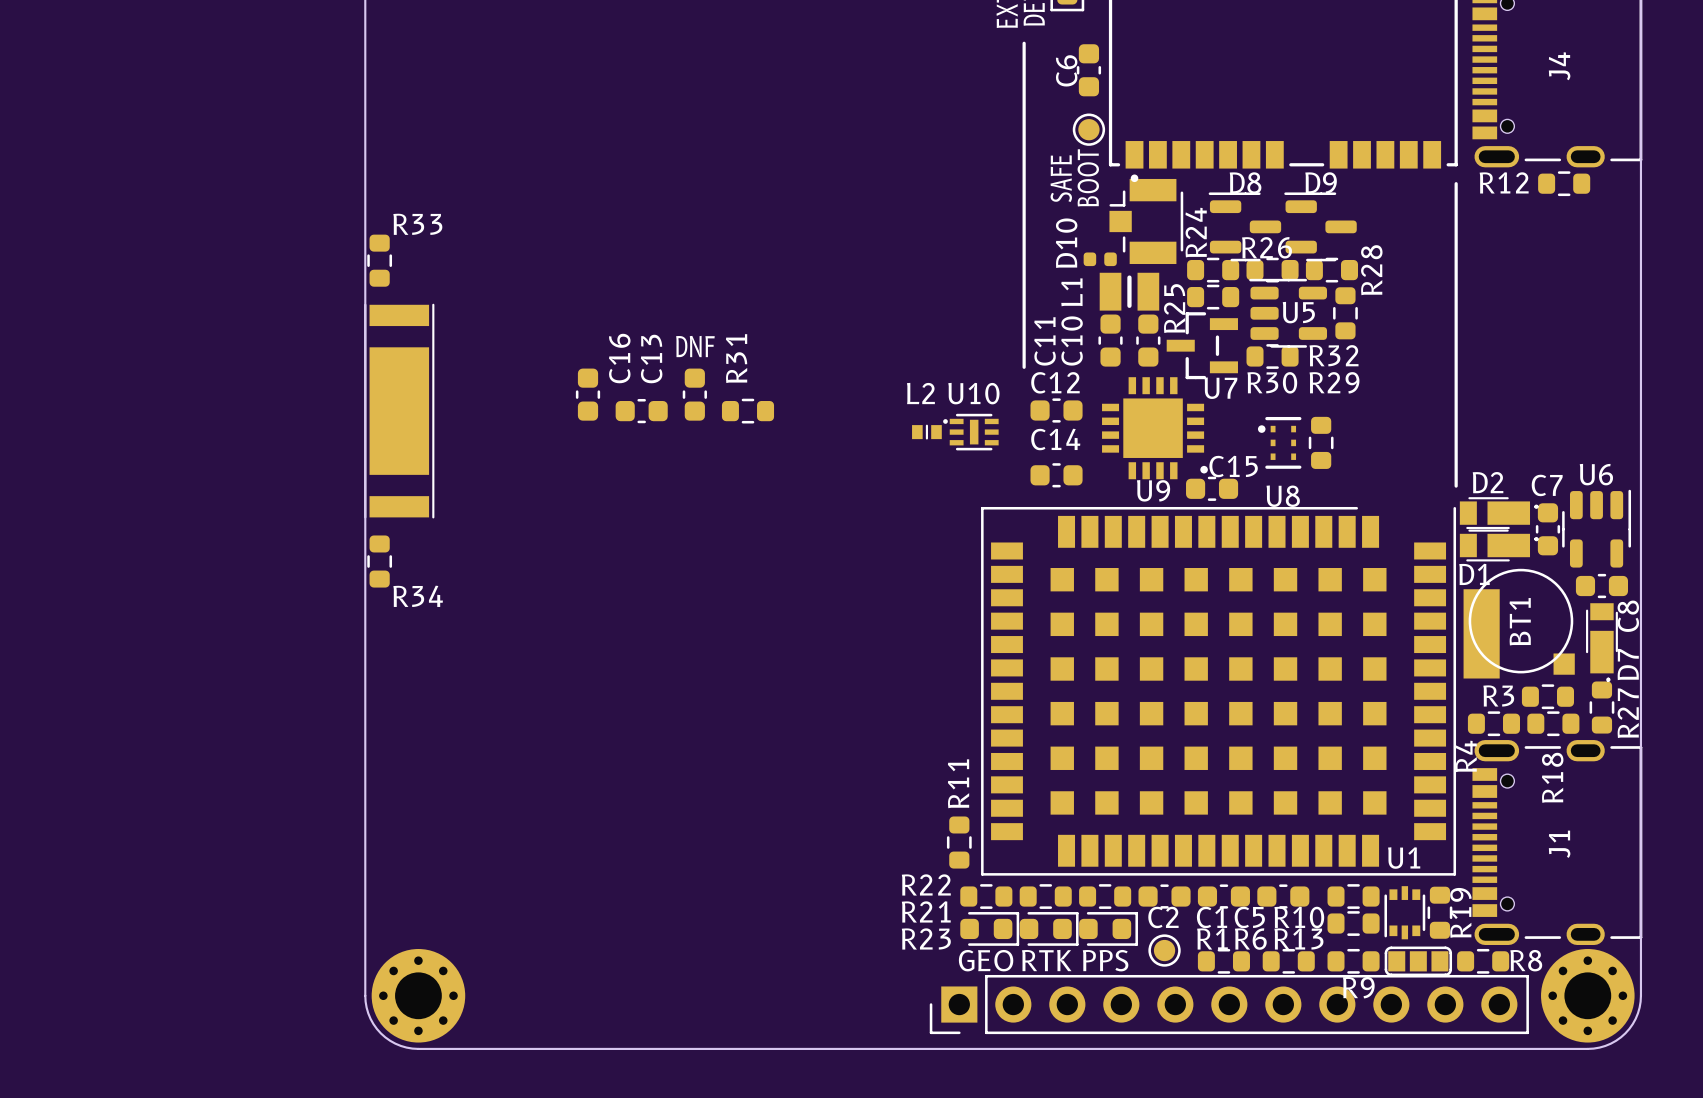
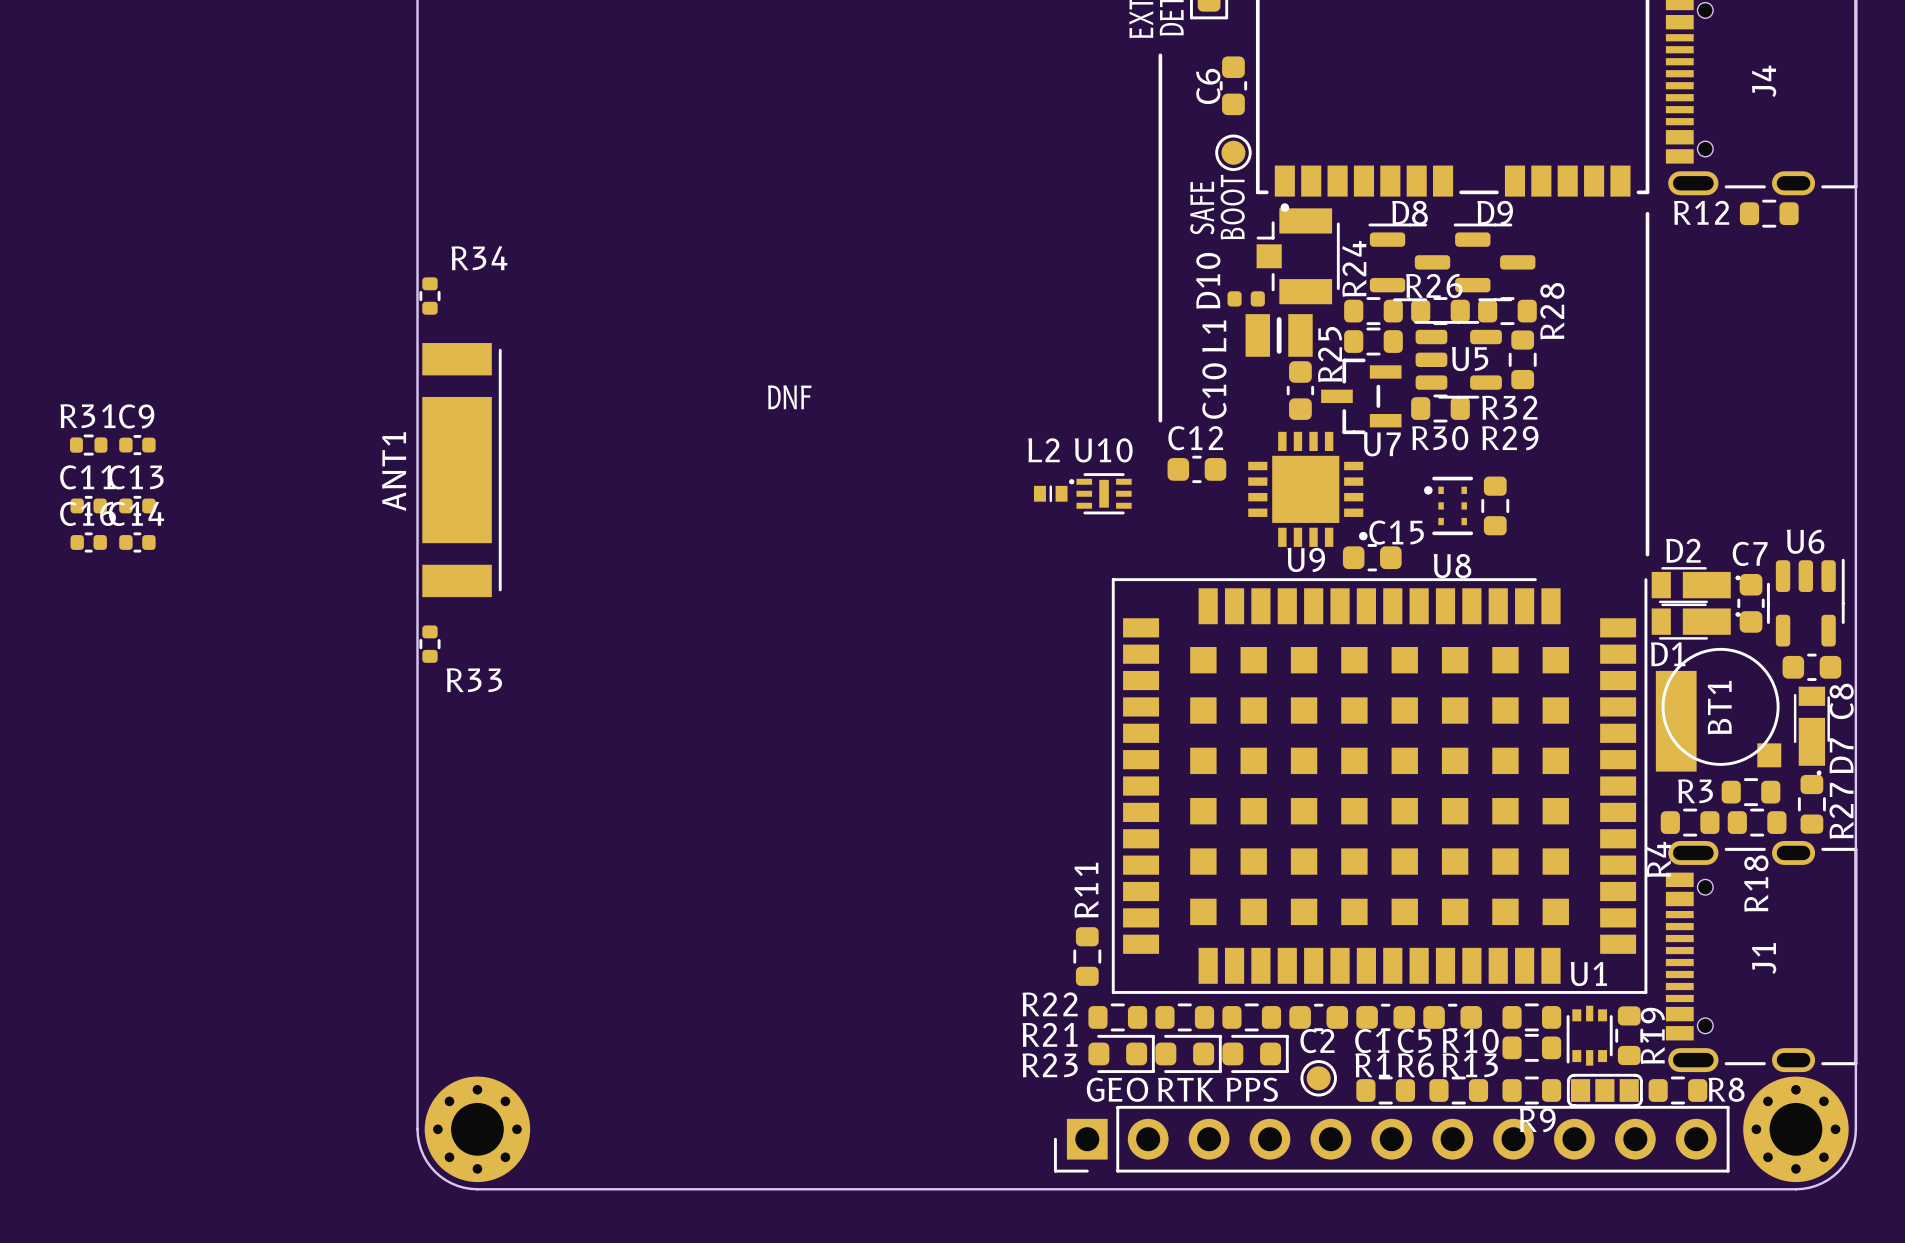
R33 name position: R33 (417, 224) -> R33 (474, 680)
R33 footprint: [367, 234, 393, 287] -> [419, 625, 441, 663]
C11 footprint: [1098, 314, 1123, 367] -> [70, 495, 107, 517]
C11 name position: C11 (1045, 341) -> C11 (87, 477)
C16 footprint: [575, 368, 601, 421] -> [70, 532, 107, 553]
C9: none -> (137, 445)
part: (694, 394) -> none
C13 footprint: [615, 398, 668, 424] -> [119, 495, 156, 517]
R31 footprint: [721, 398, 775, 424] -> [70, 434, 108, 456]
part: (399, 411) -> none
ANT1: none -> (461, 470)
C14 footprint: [1030, 463, 1083, 488] -> [119, 532, 156, 553]
R34 footprint: [367, 535, 393, 588] -> [419, 277, 441, 315]
R34 name position: R34 (418, 596) -> R34 (479, 258)

